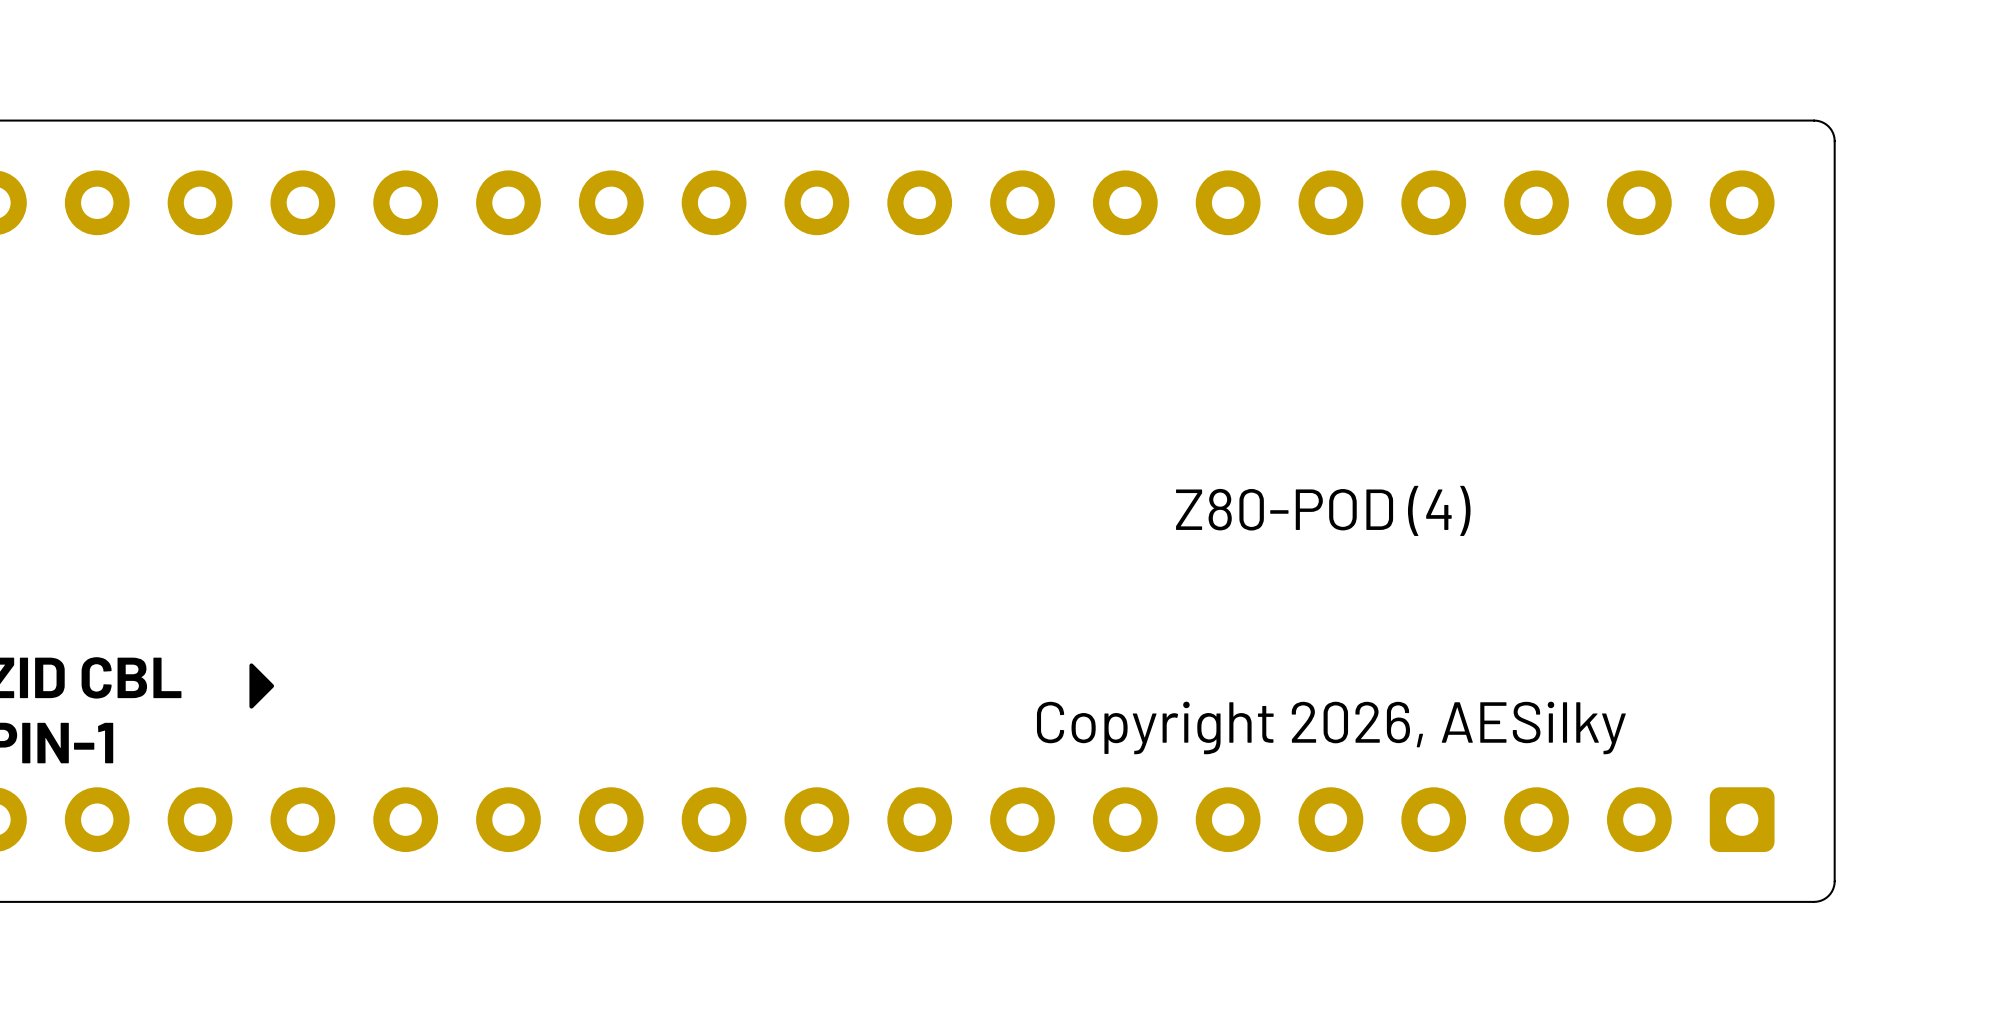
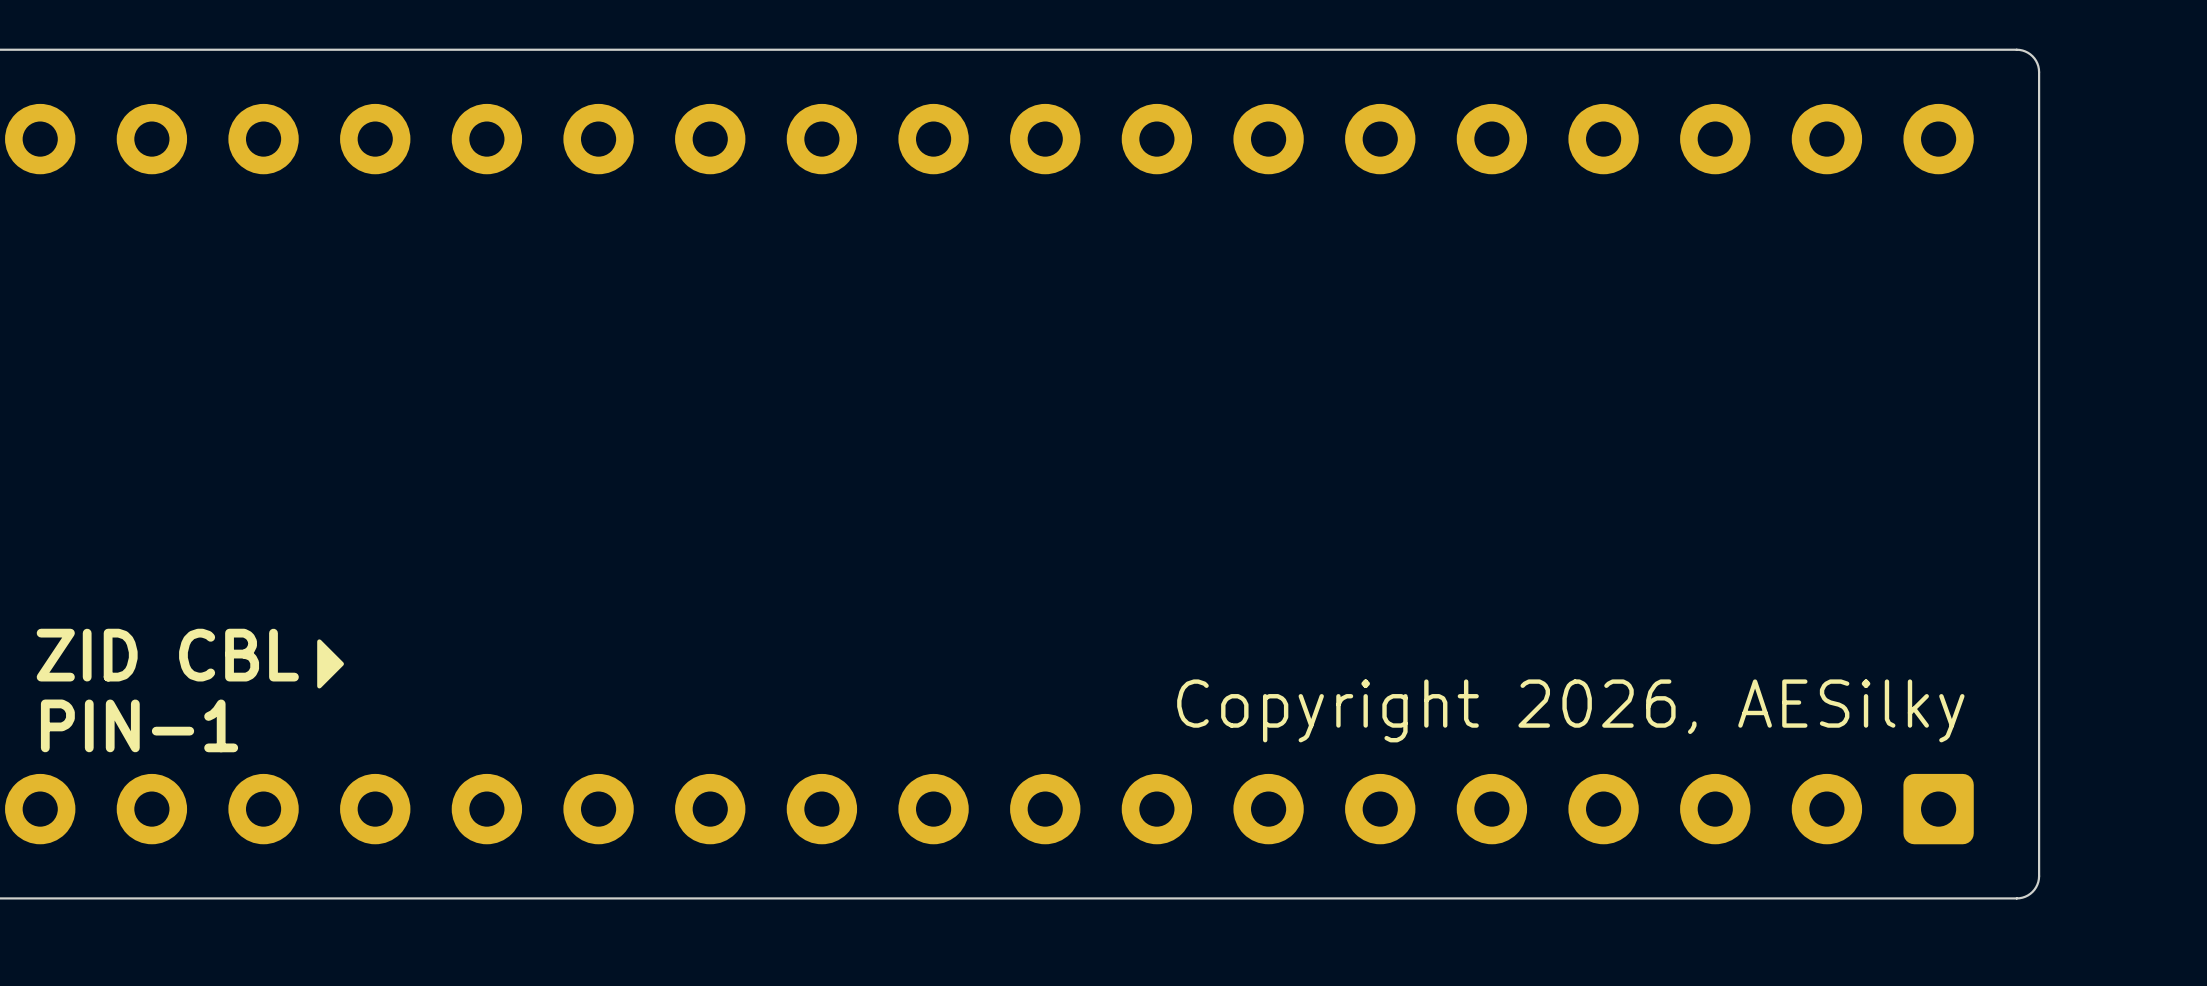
part: Z80-POD (4) (1323, 510) -> none

